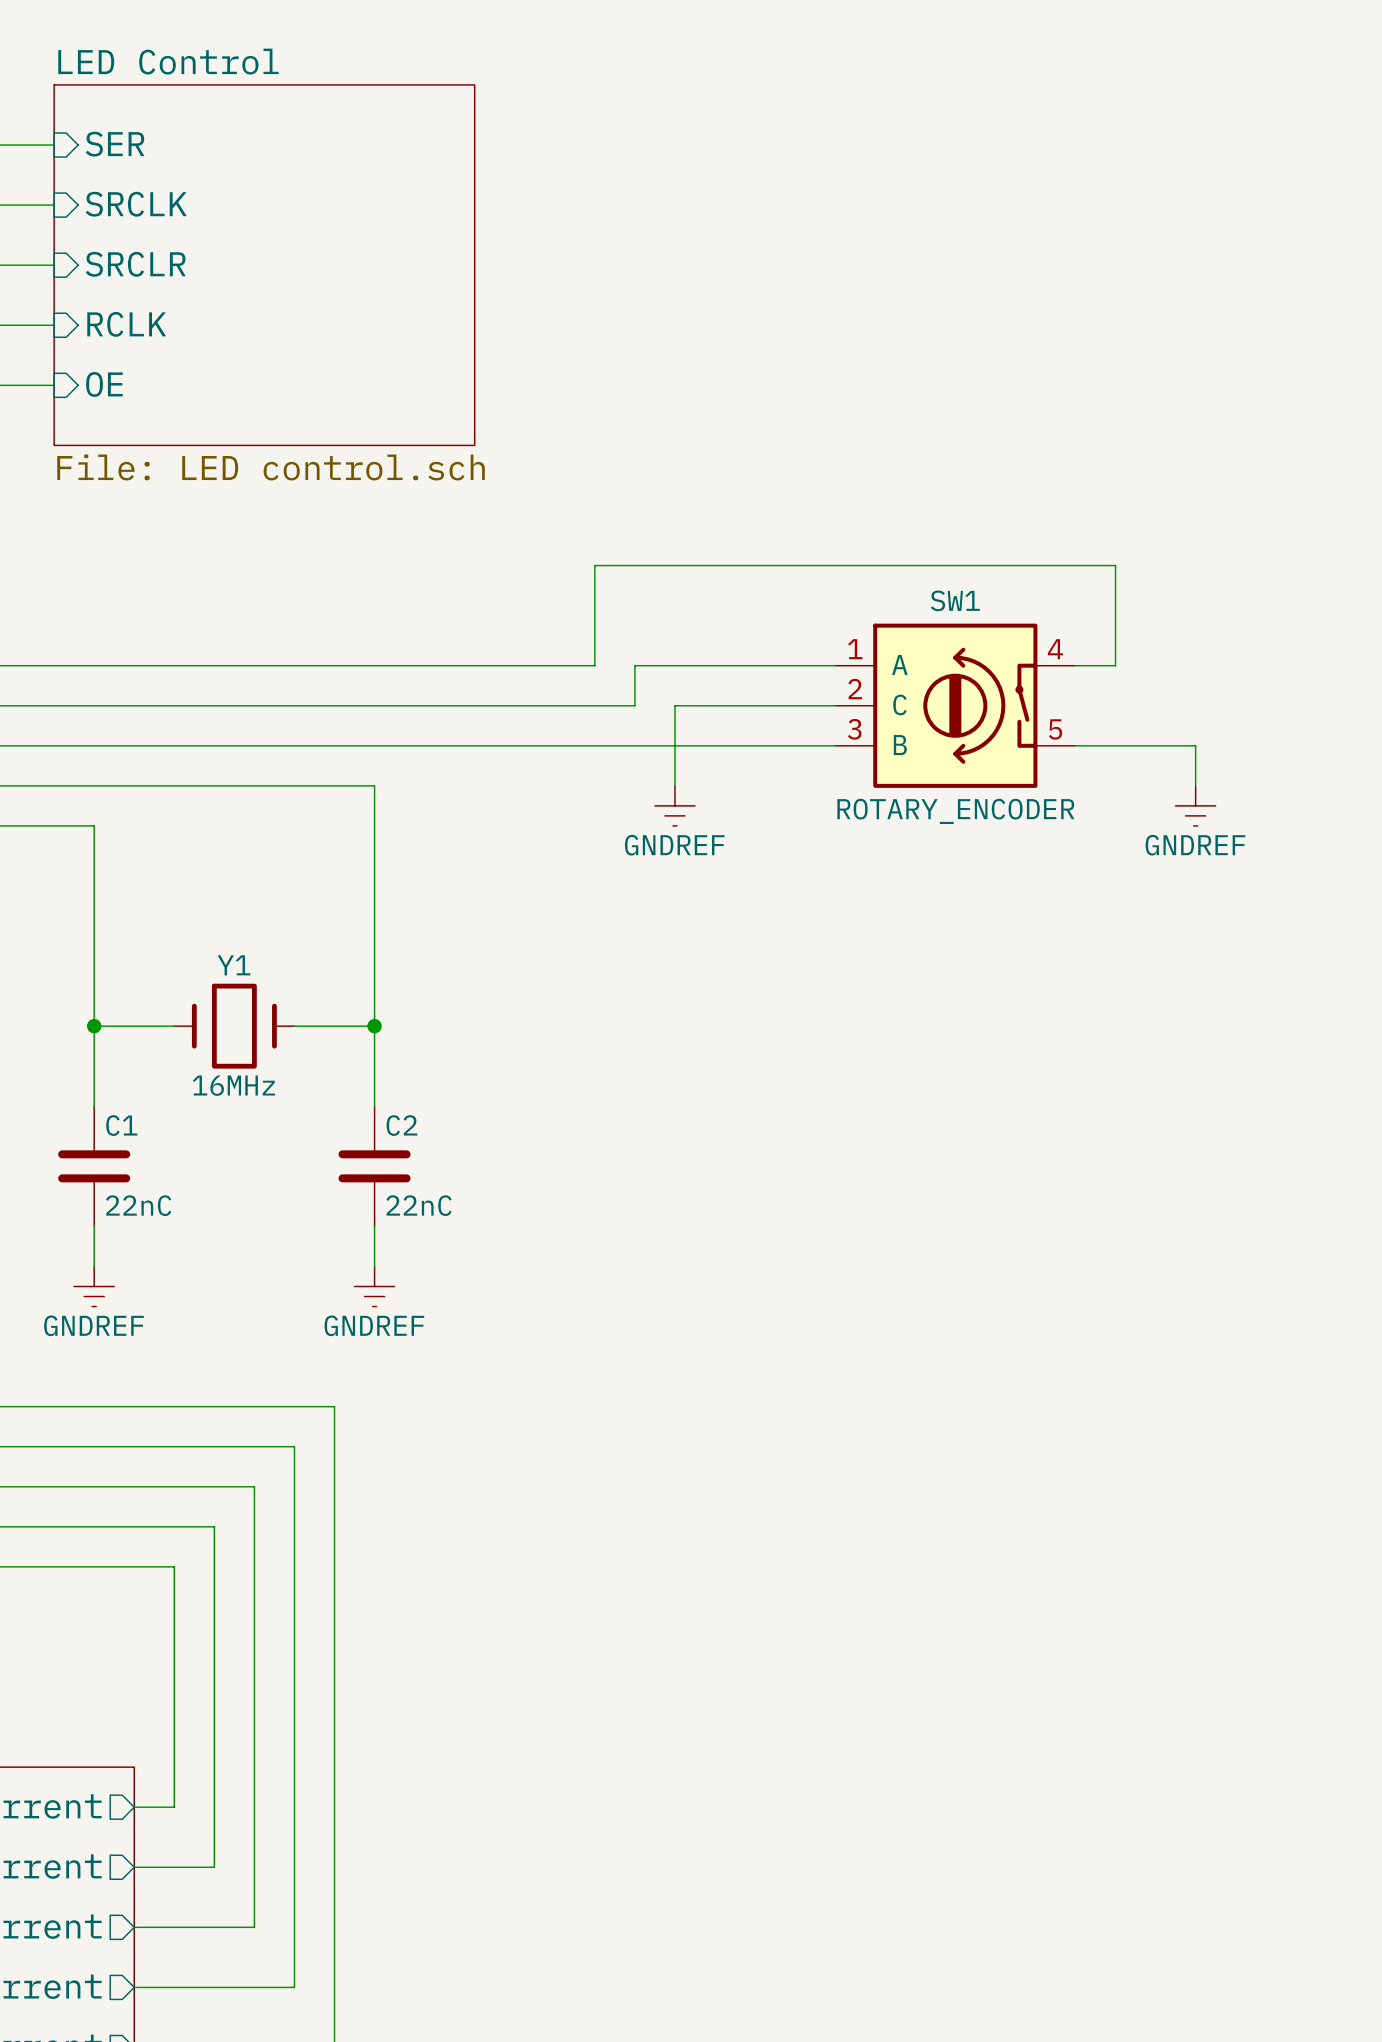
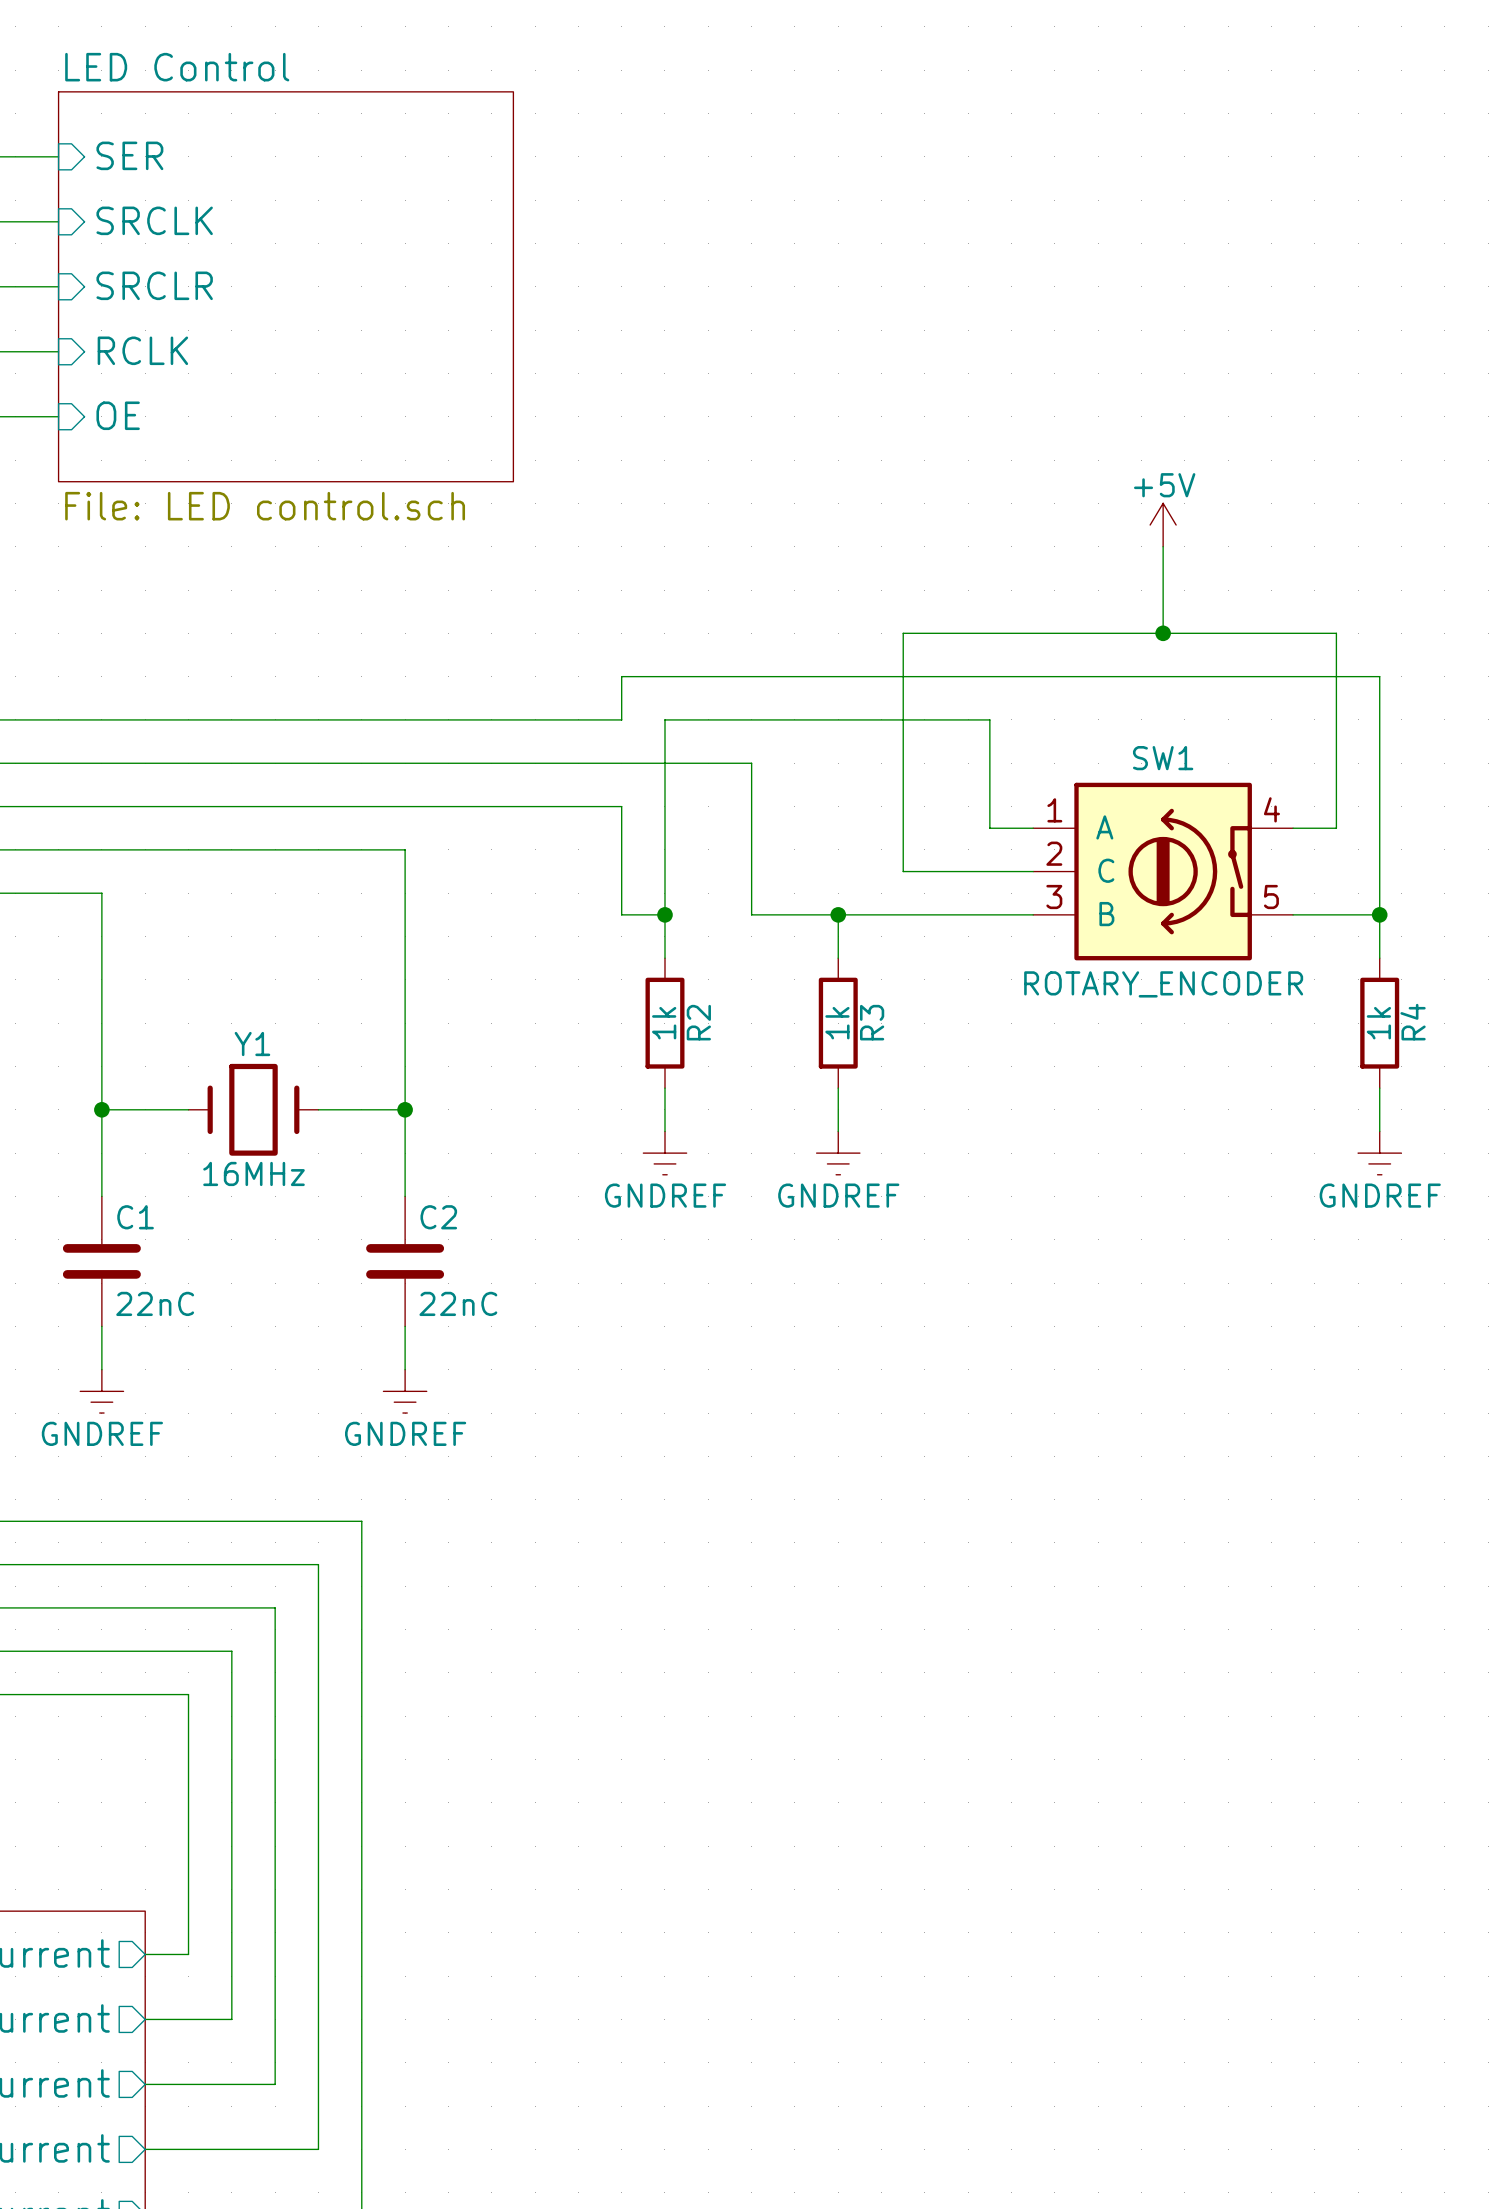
power symbol: none -> +5V (1163, 525)
wire: none -> (1163, 546) (1163, 633)
junction: none -> (1163, 633)
wire: (574, 665) (594, 665) (594, 565) (1115, 565) (1115, 665) (1075, 665) -> (621, 719) (621, 676) (1379, 676) (1379, 958)
wire: (634, 665) (634, 705) -> (729, 763) (686, 763)
wire: none -> (686, 719) (664, 719) (664, 958)
wire: (674, 705) (674, 785) -> none
wire: (694, 705) (835, 705) -> (751, 763) (751, 914) (1033, 914)
SW1 position: (955, 705) -> (1163, 871)
wire: (574, 745) (835, 745) -> (621, 806) (621, 914) (664, 914)
wire: (1075, 745) (1195, 745) (1195, 785) -> none
wire: none -> (1293, 828) (1336, 828) (1336, 633) (903, 633) (903, 871) (1033, 871)
power symbol: GNDREF (674, 805) -> none
power symbol: GNDREF (1195, 805) -> none
junction: none -> (664, 914)
wire: none -> (838, 914) (838, 958)
junction: none -> (838, 914)
wire: none -> (1293, 914) (1379, 914)
junction: none -> (1379, 914)
R2: none -> 1k (664, 1023)
R3: none -> 1k (838, 1023)
R4: none -> 1k (1379, 1023)
wire: none -> (664, 1088) (664, 1131)
wire: none -> (838, 1088) (838, 1131)
wire: none -> (1379, 1088) (1379, 1131)
power symbol: none -> GNDREF (664, 1153)
power symbol: none -> GNDREF (838, 1153)
power symbol: none -> GNDREF (1379, 1153)

